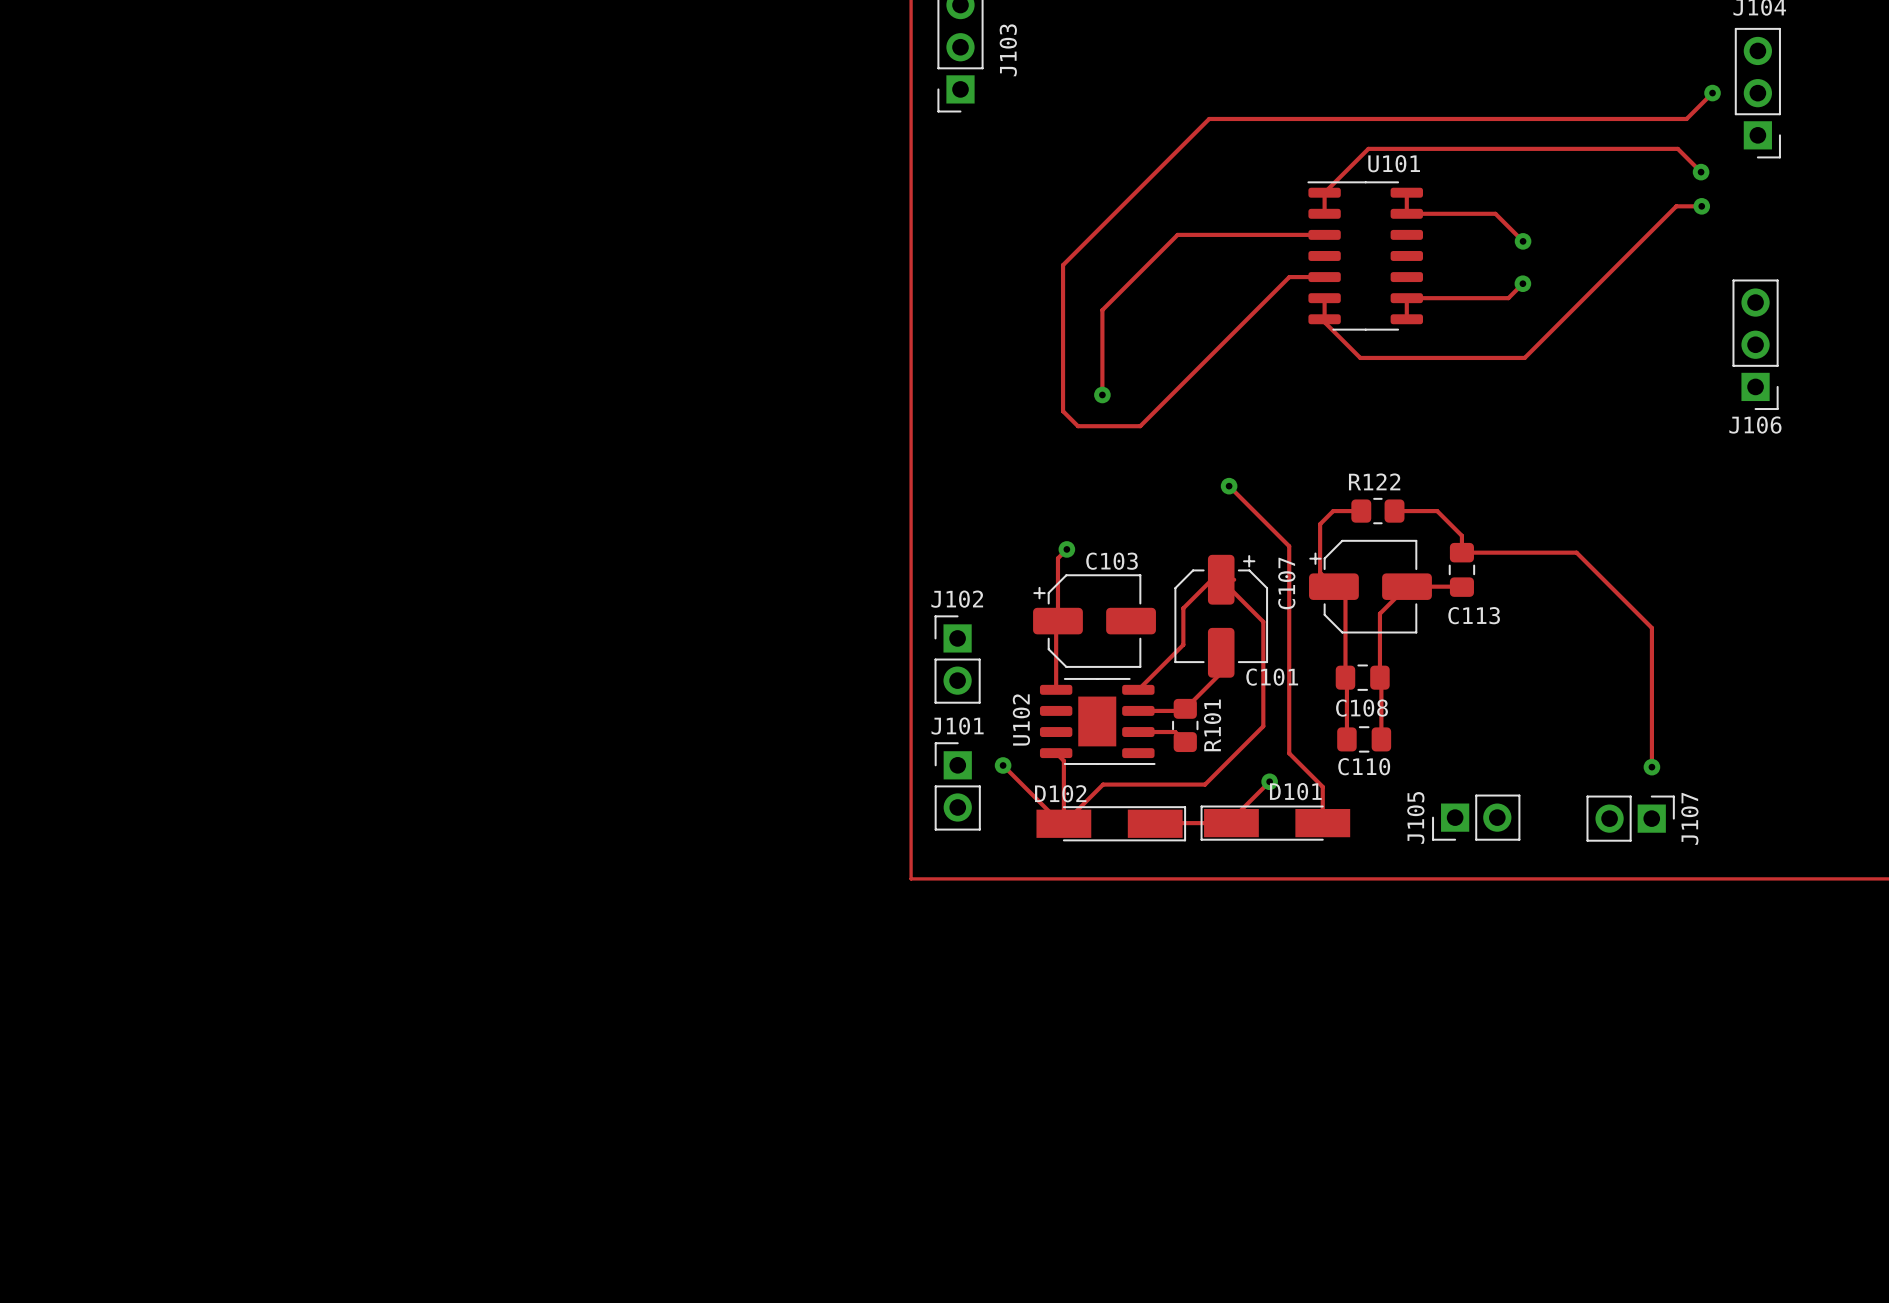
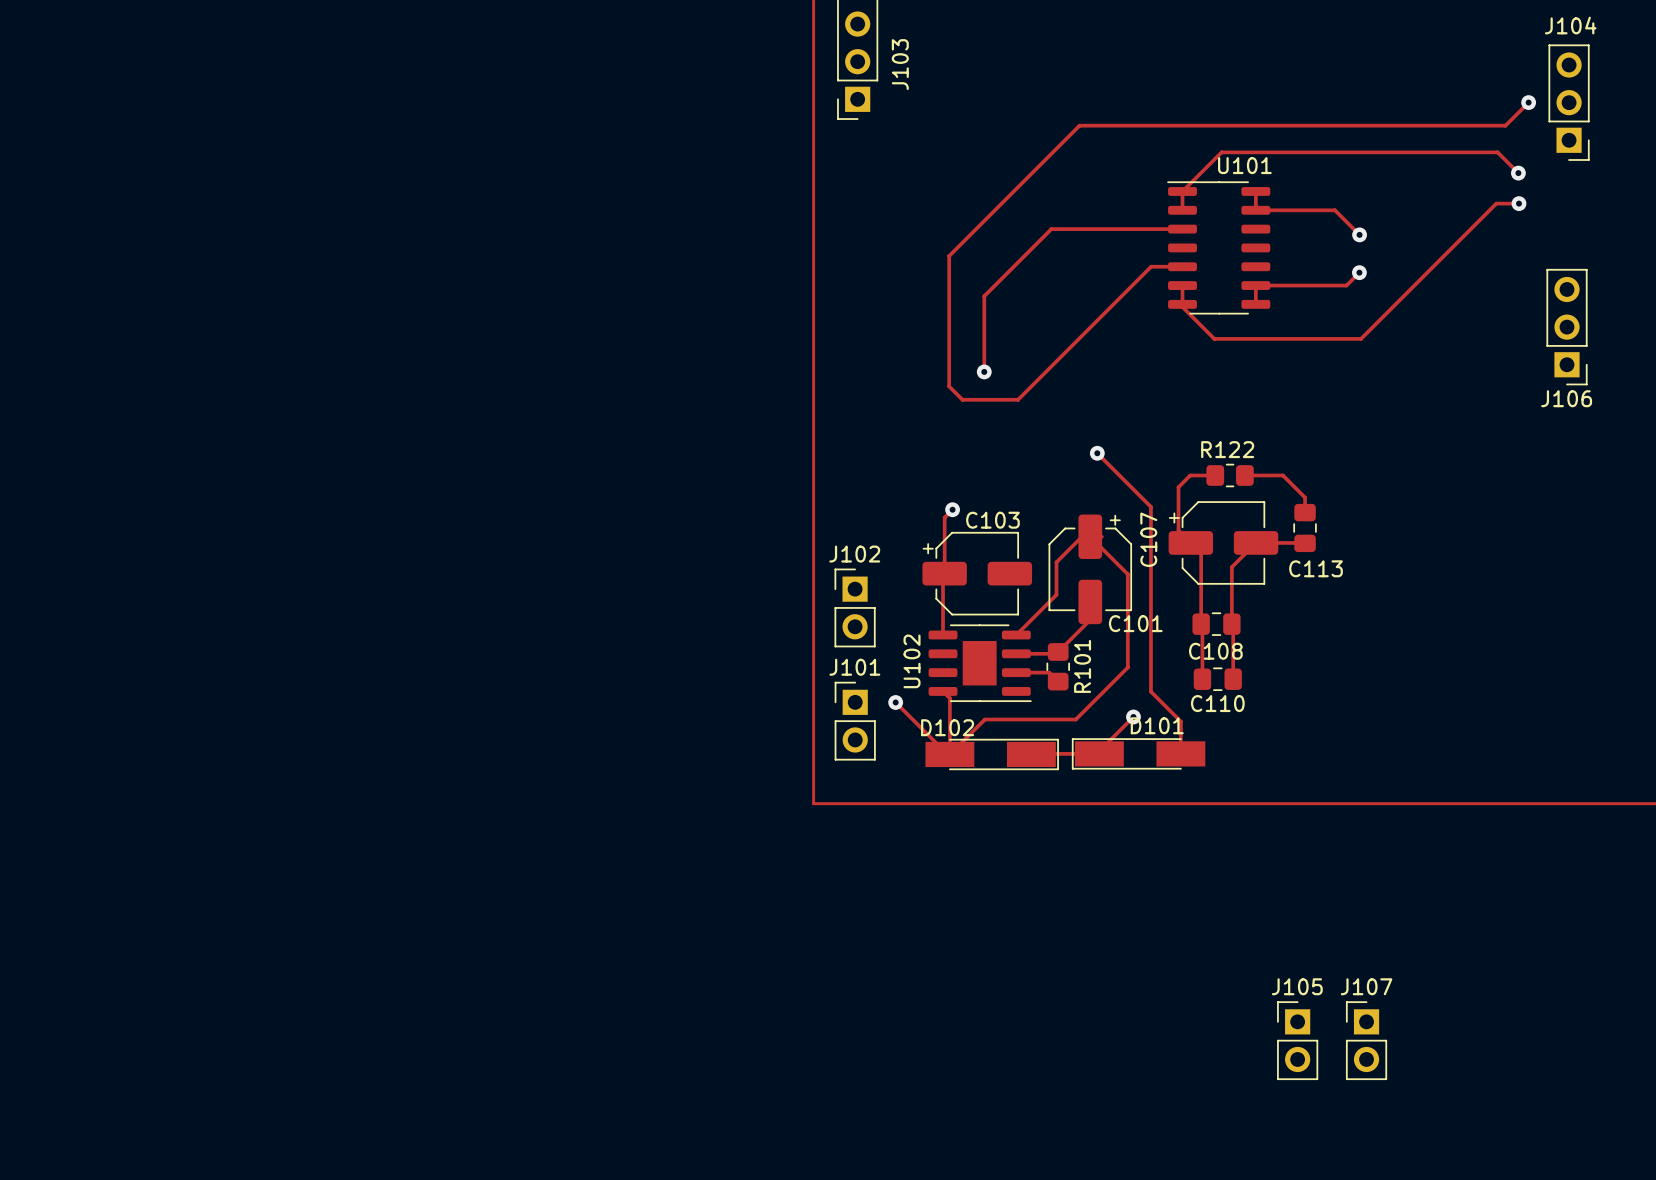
track: (1461, 552) (1576, 552) (1651, 627) (1651, 767) -> none
via: (1651, 767) -> none
J105 rotation: 0° (1476, 817) -> 90° clockwise (1297, 1040)
J105 position: (1476, 817) -> (1297, 1040)
J107 rotation: 0° (1630, 818) -> 90° counterclockwise (1366, 1040)
J107 position: (1630, 818) -> (1366, 1040)

